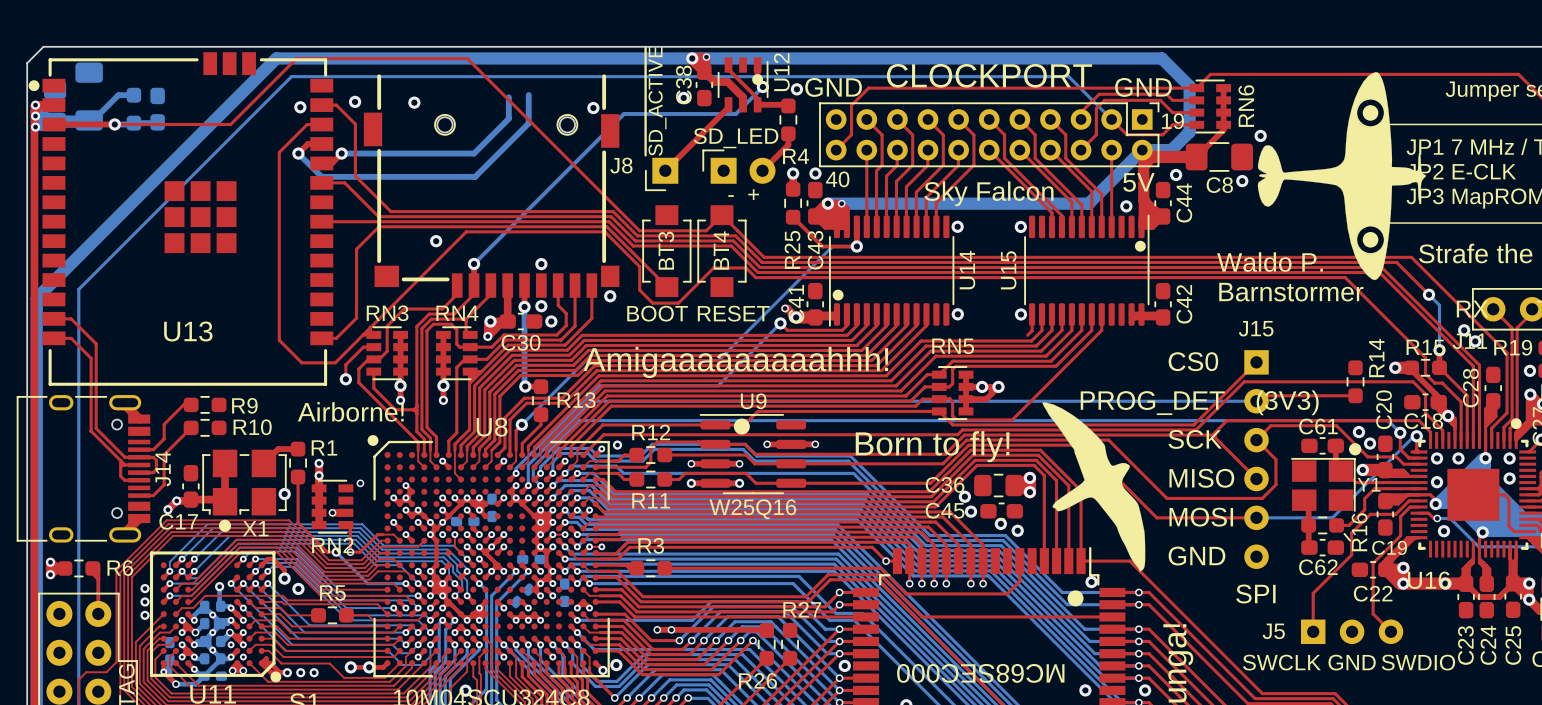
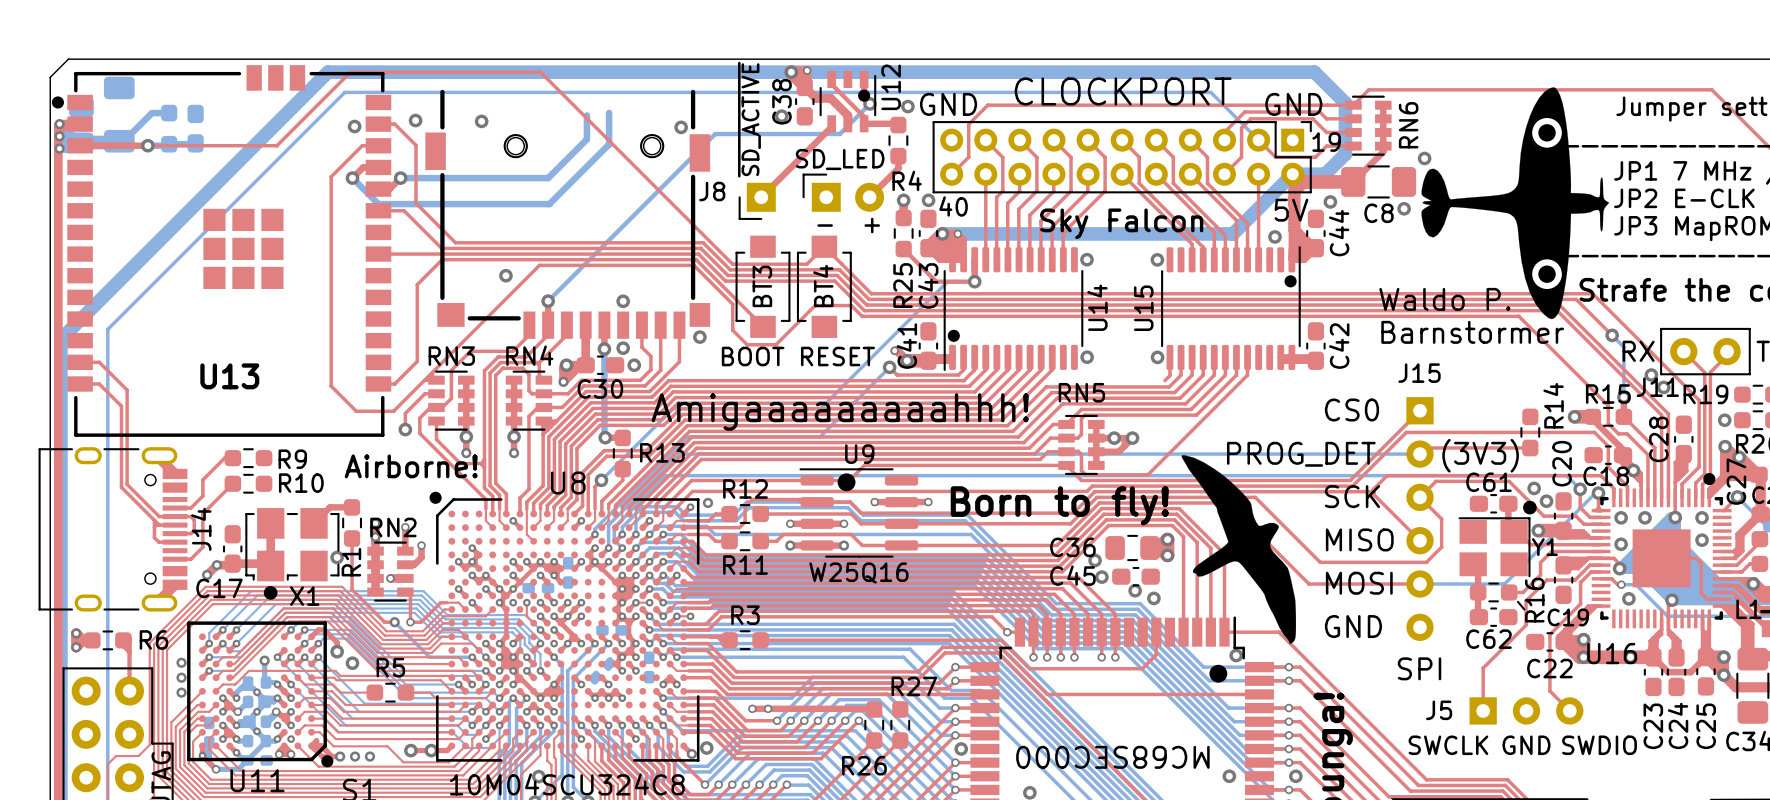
R1 name rotation: 0° (324, 447) -> 90° counterclockwise (351, 562)
R1 name position: R1 (324, 447) -> R1 (351, 562)
top track: none -> (405, 527) (405, 551)
via: none -> (405, 527)
top track: none -> (421, 545) (421, 557) (414, 564) (405, 564)
RN2 name position: RN2 (332, 545) -> RN2 (393, 527)

